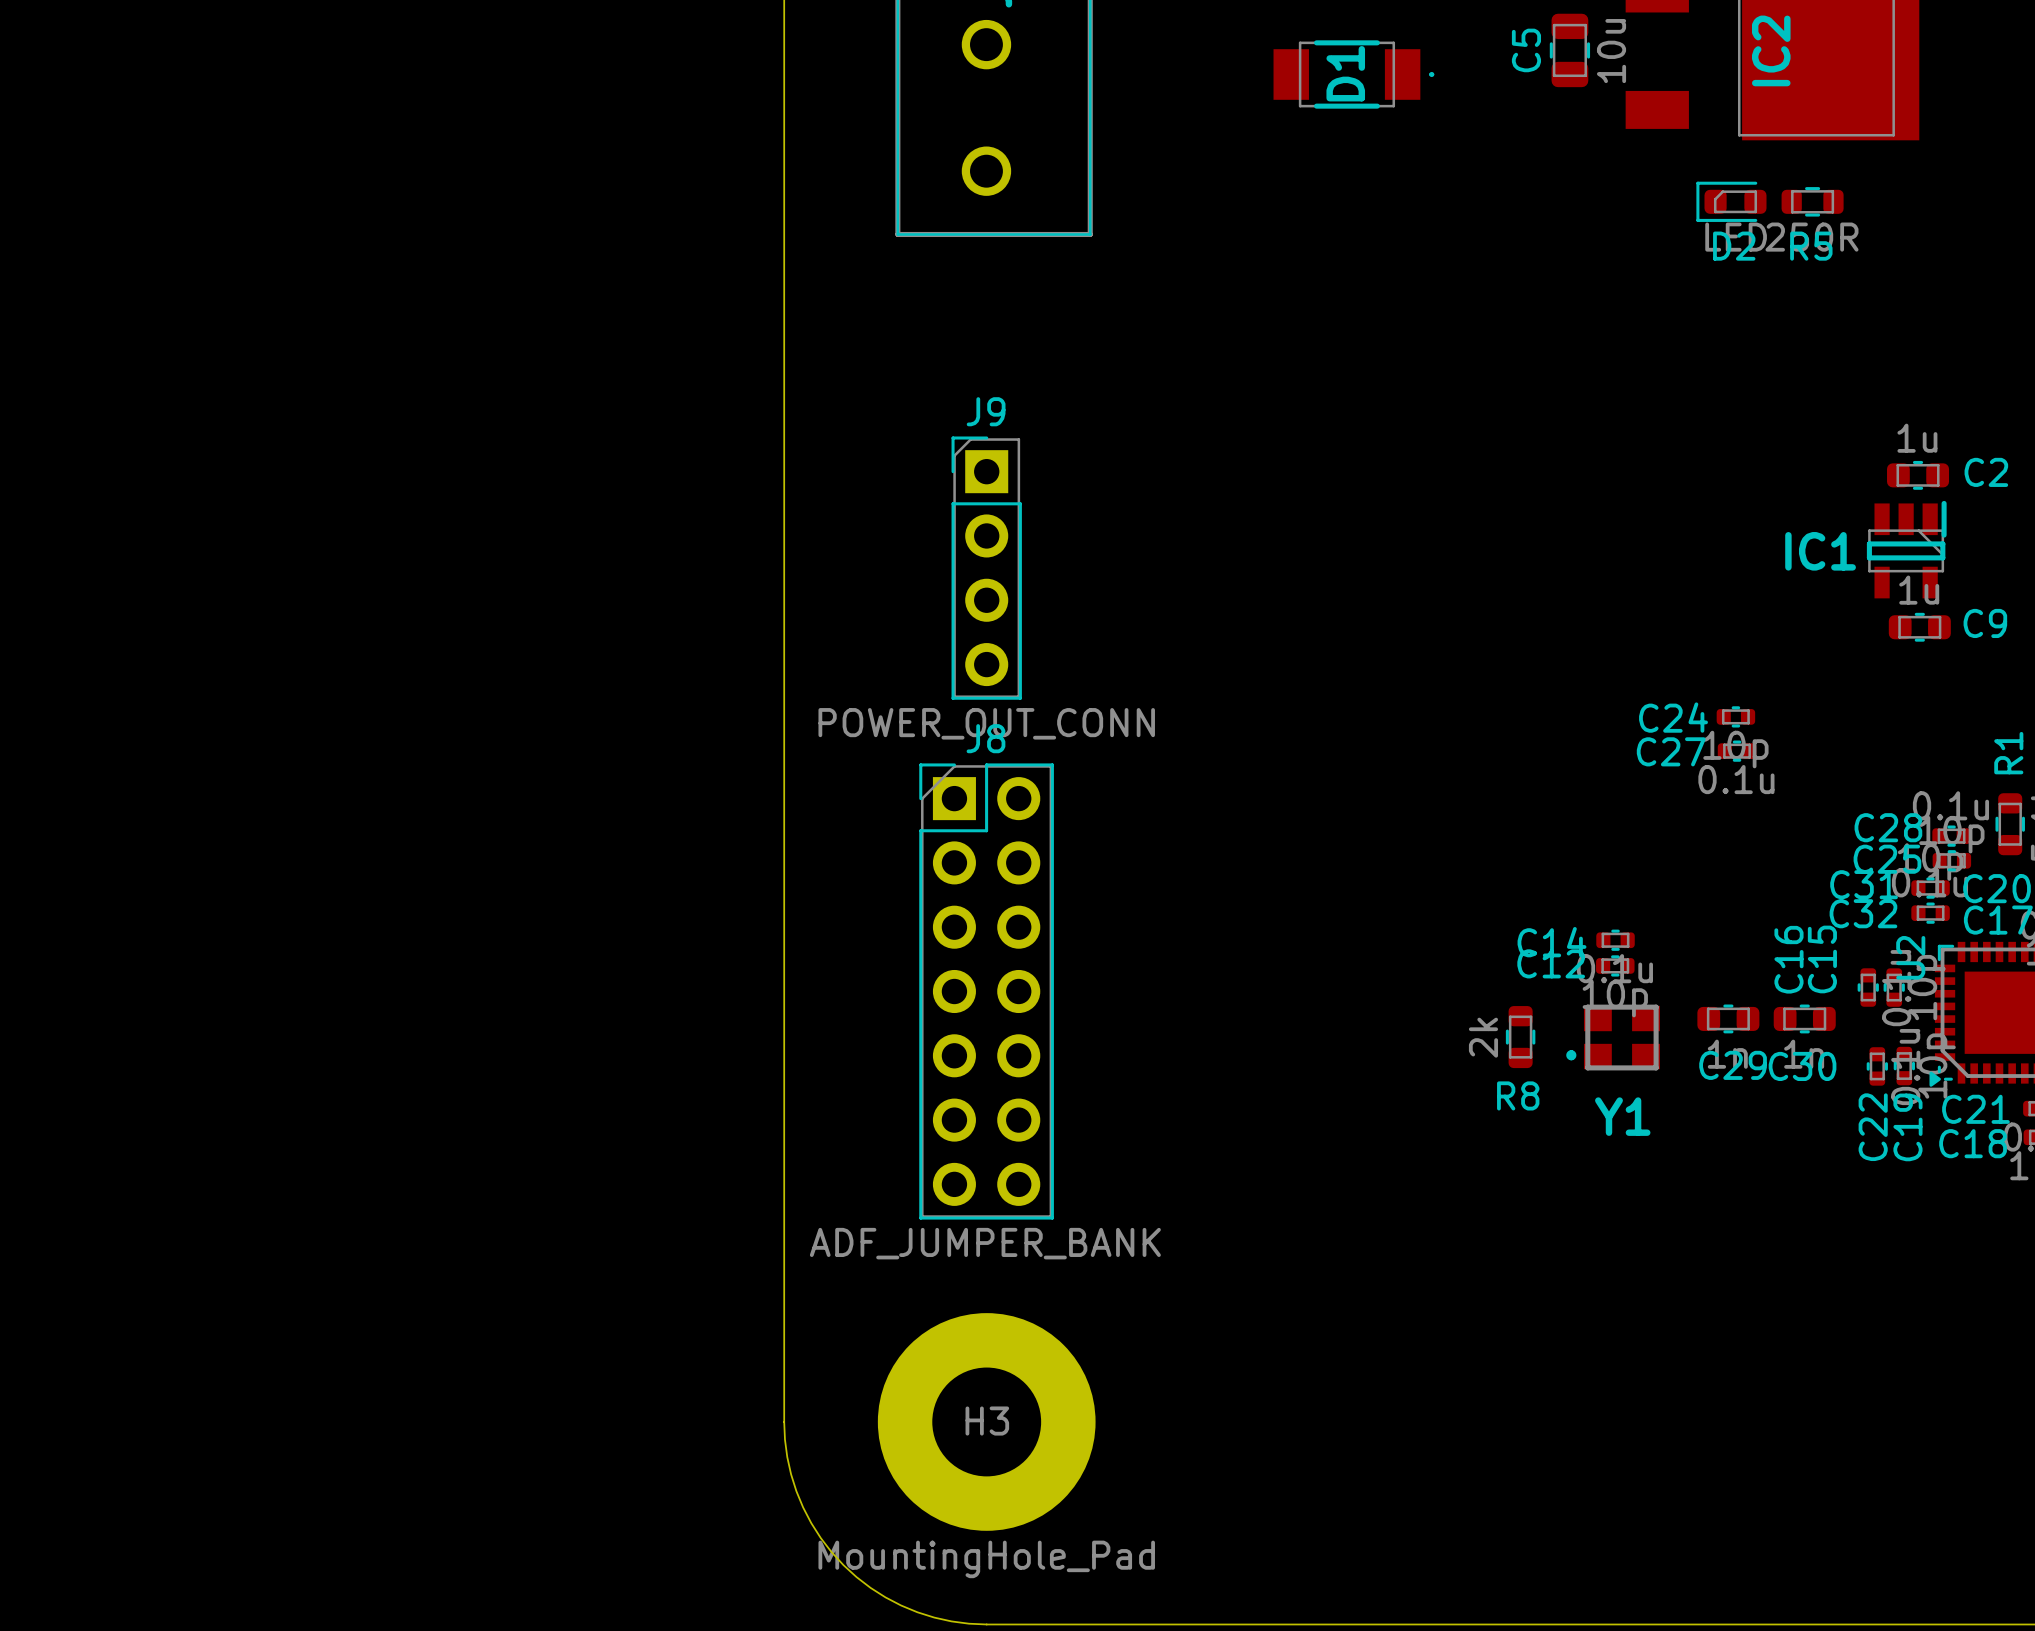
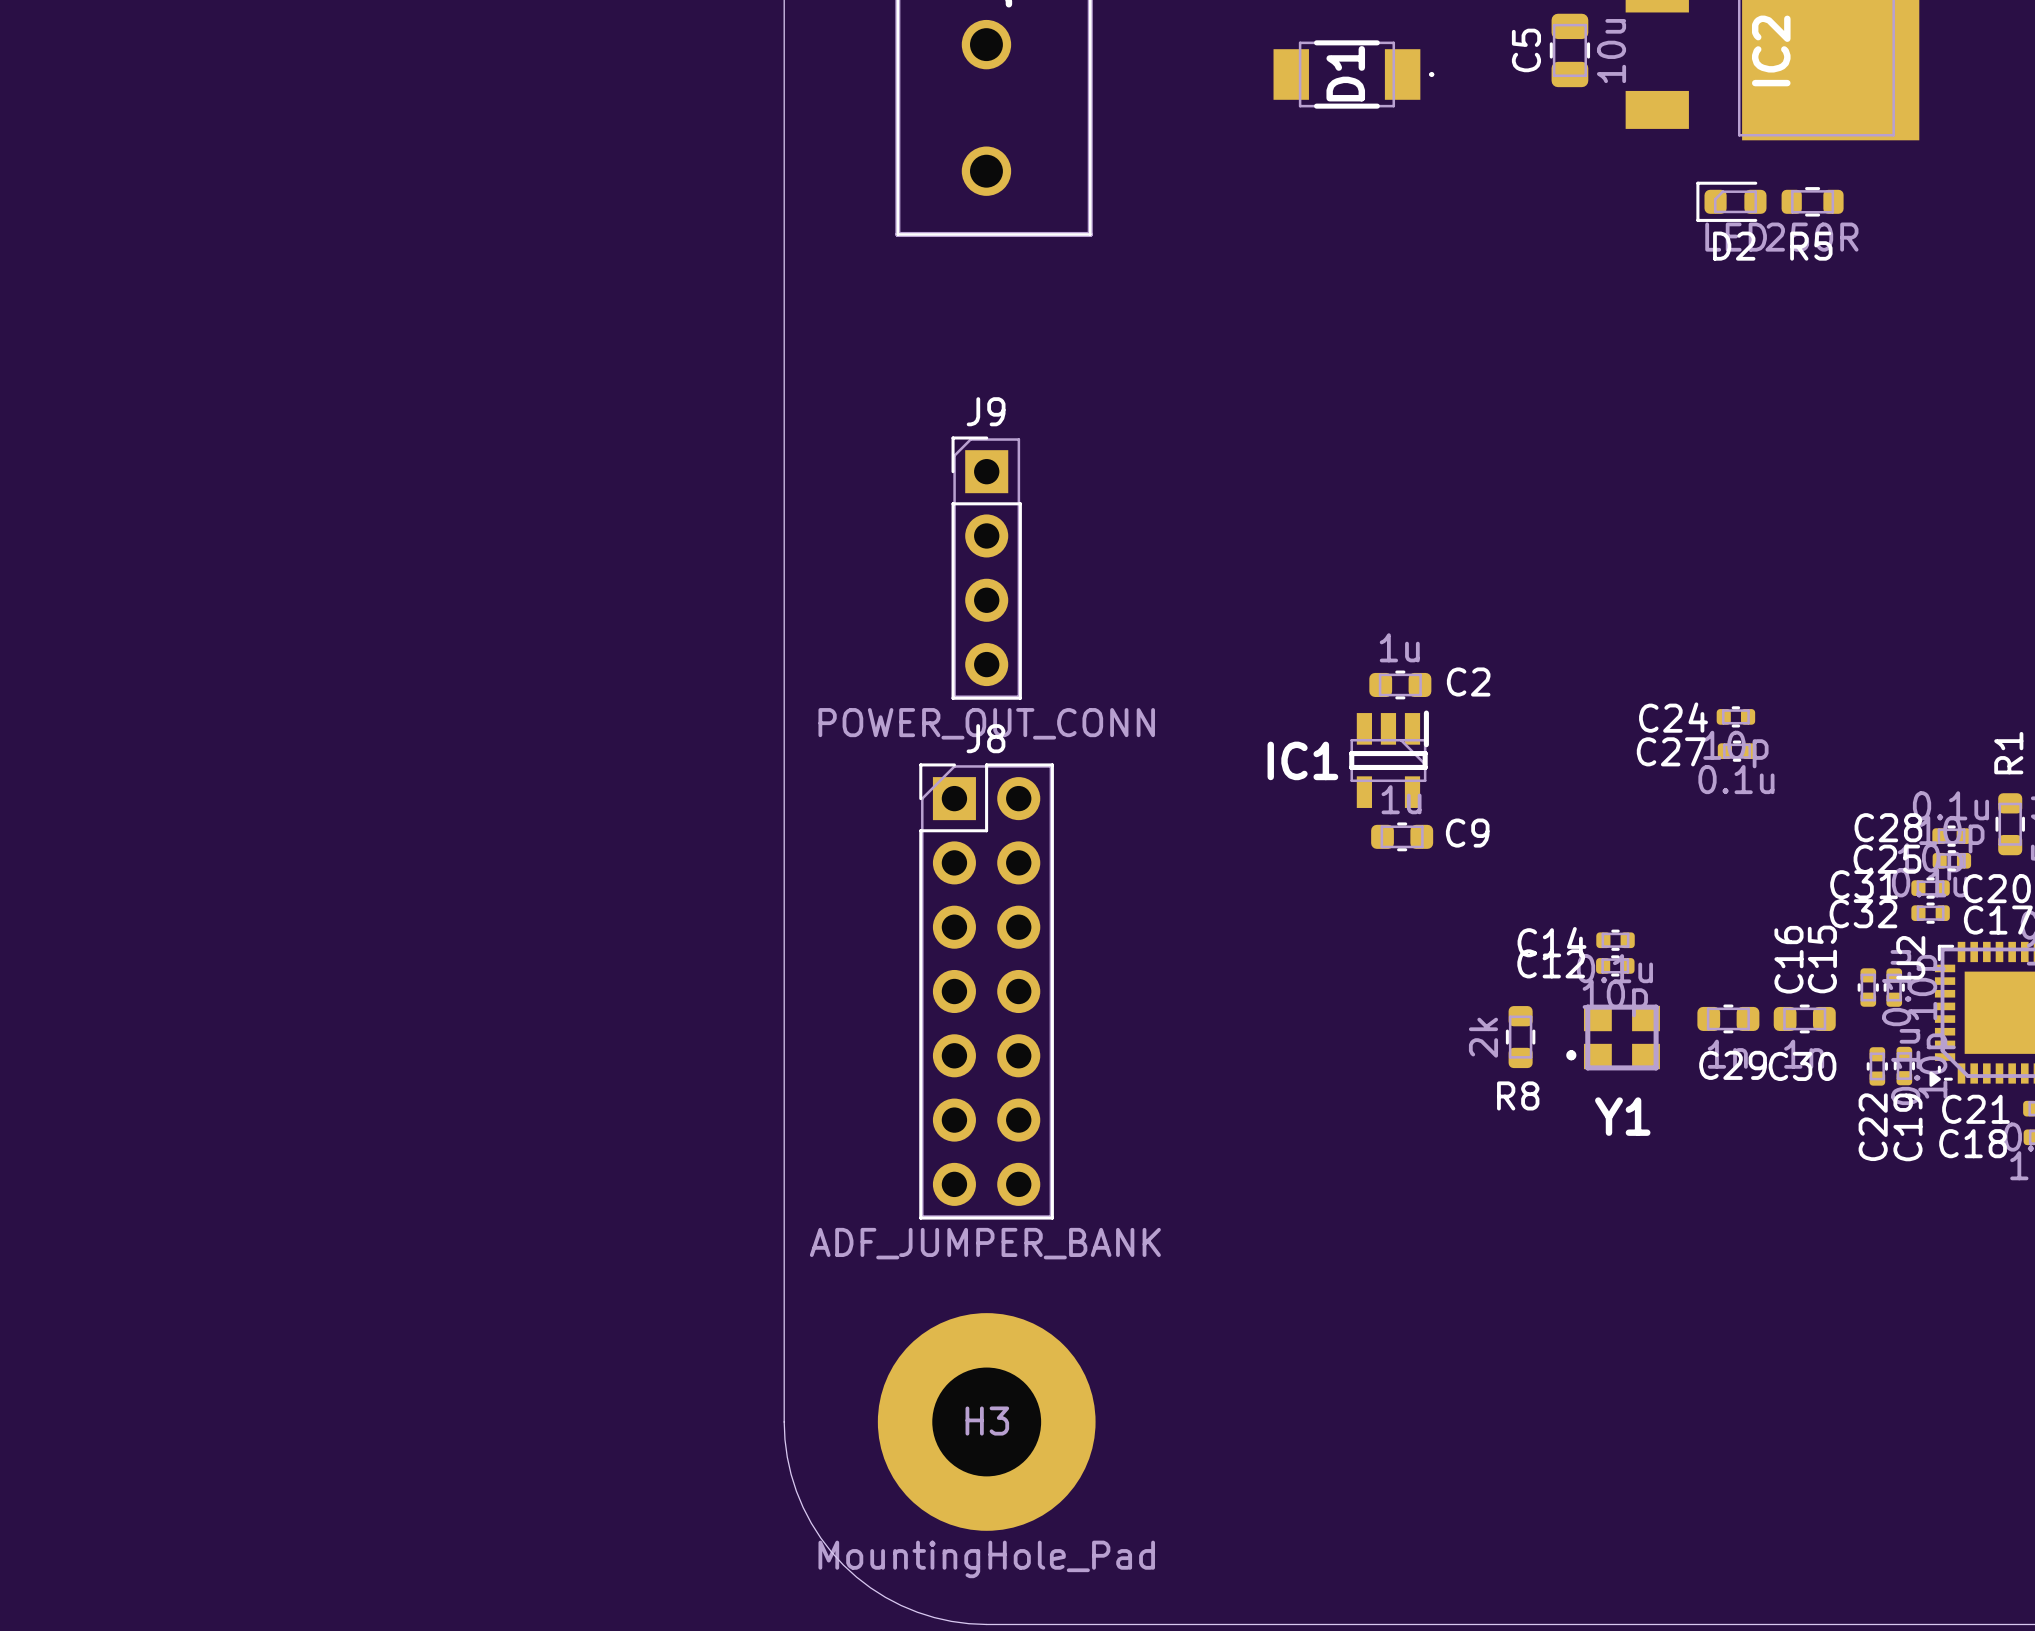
C2 position: (1918, 475) -> (1400, 684)
IC1 position: (1906, 549) -> (1389, 759)
C9 position: (1919, 627) -> (1402, 836)

